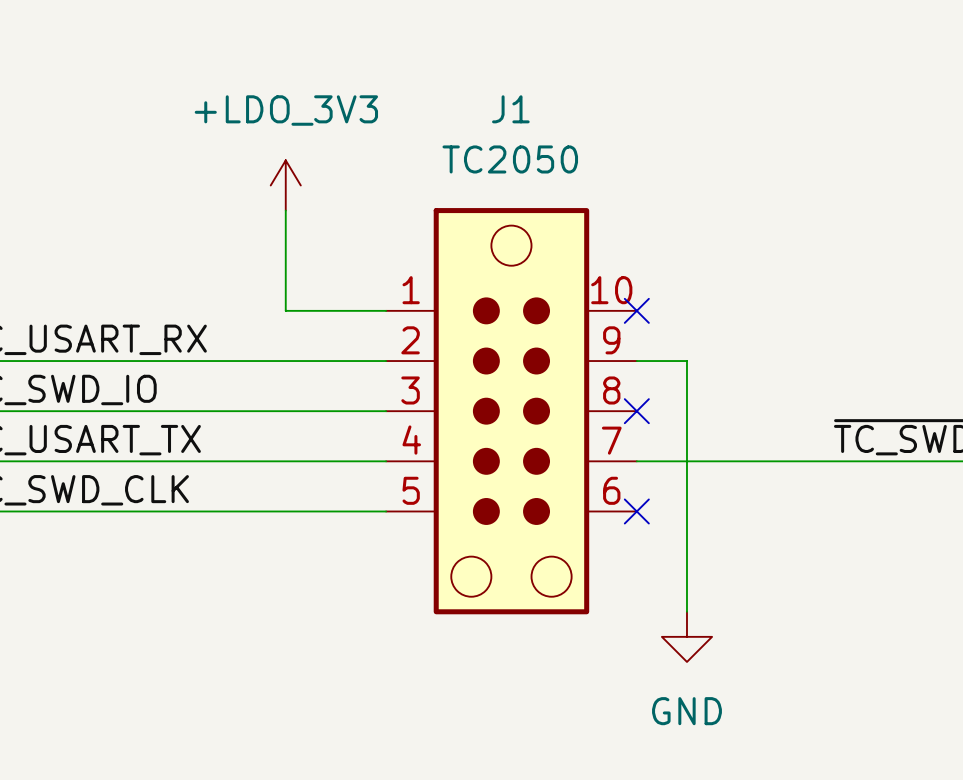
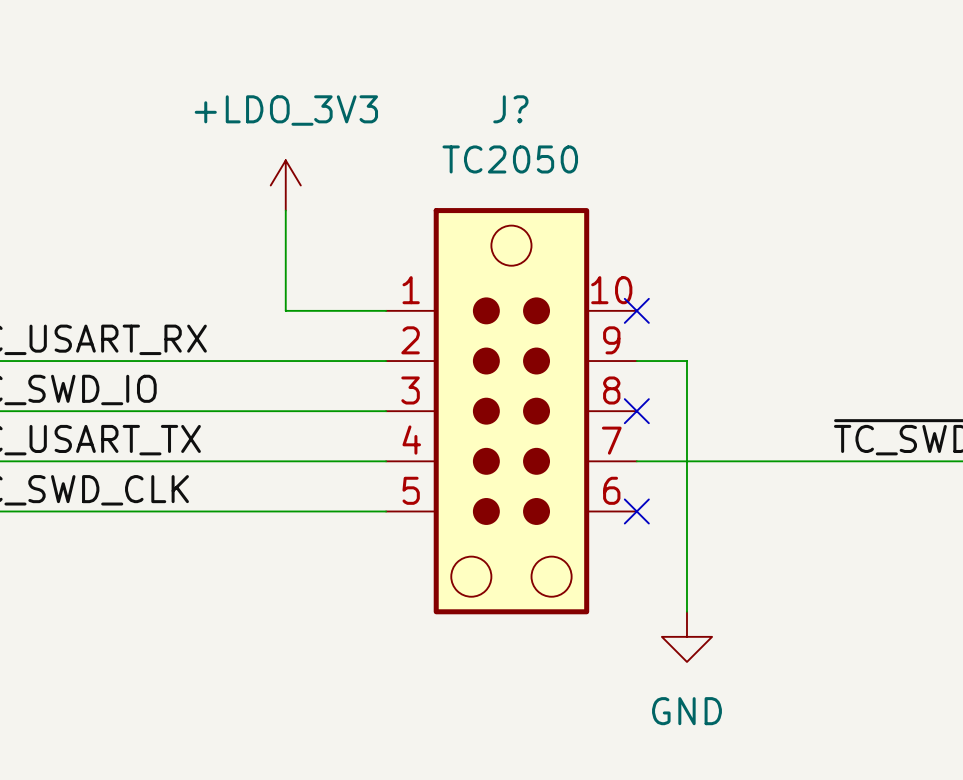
J1 name: J1 (510, 109) -> J? (510, 109)

